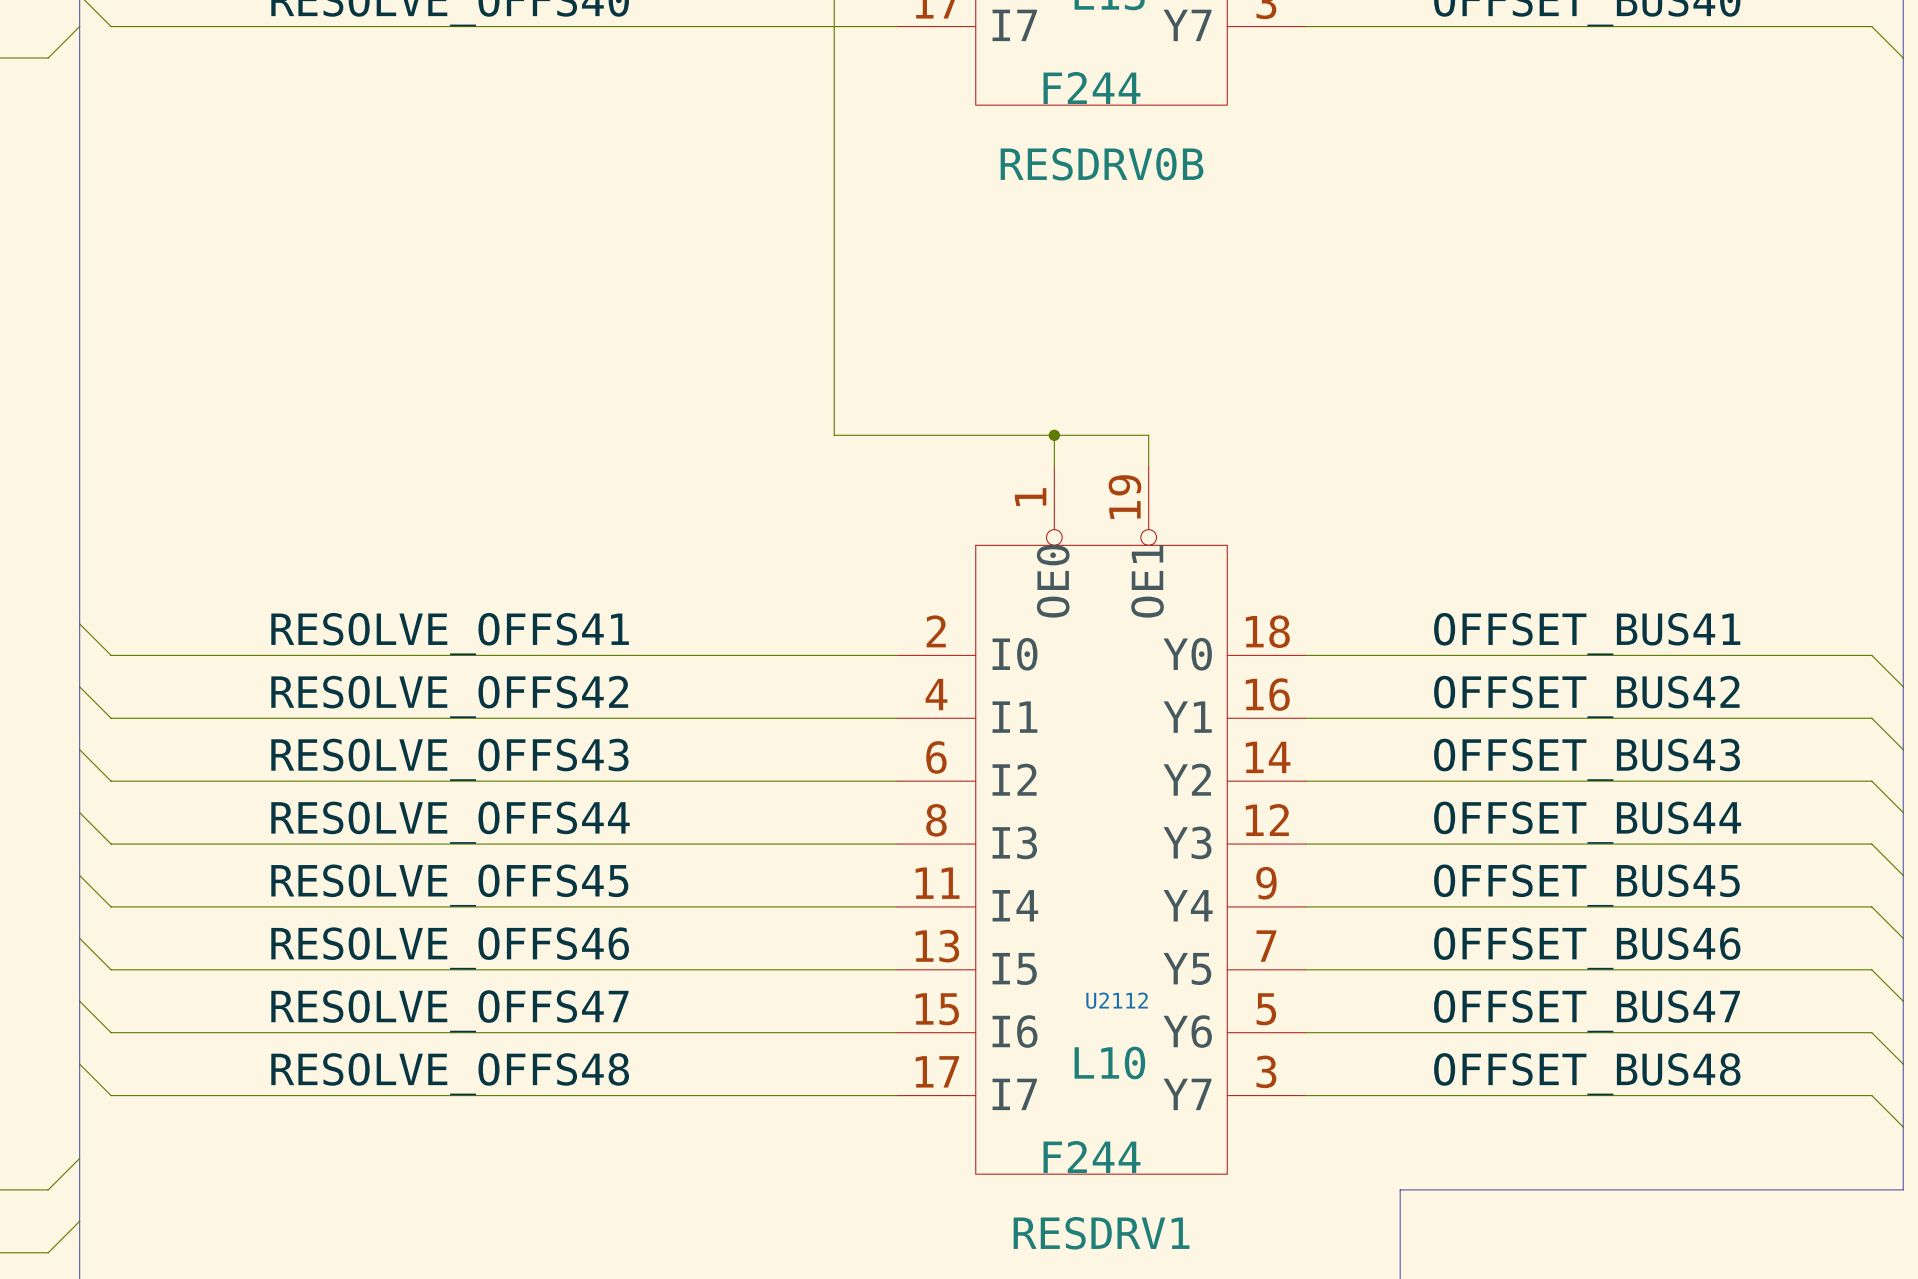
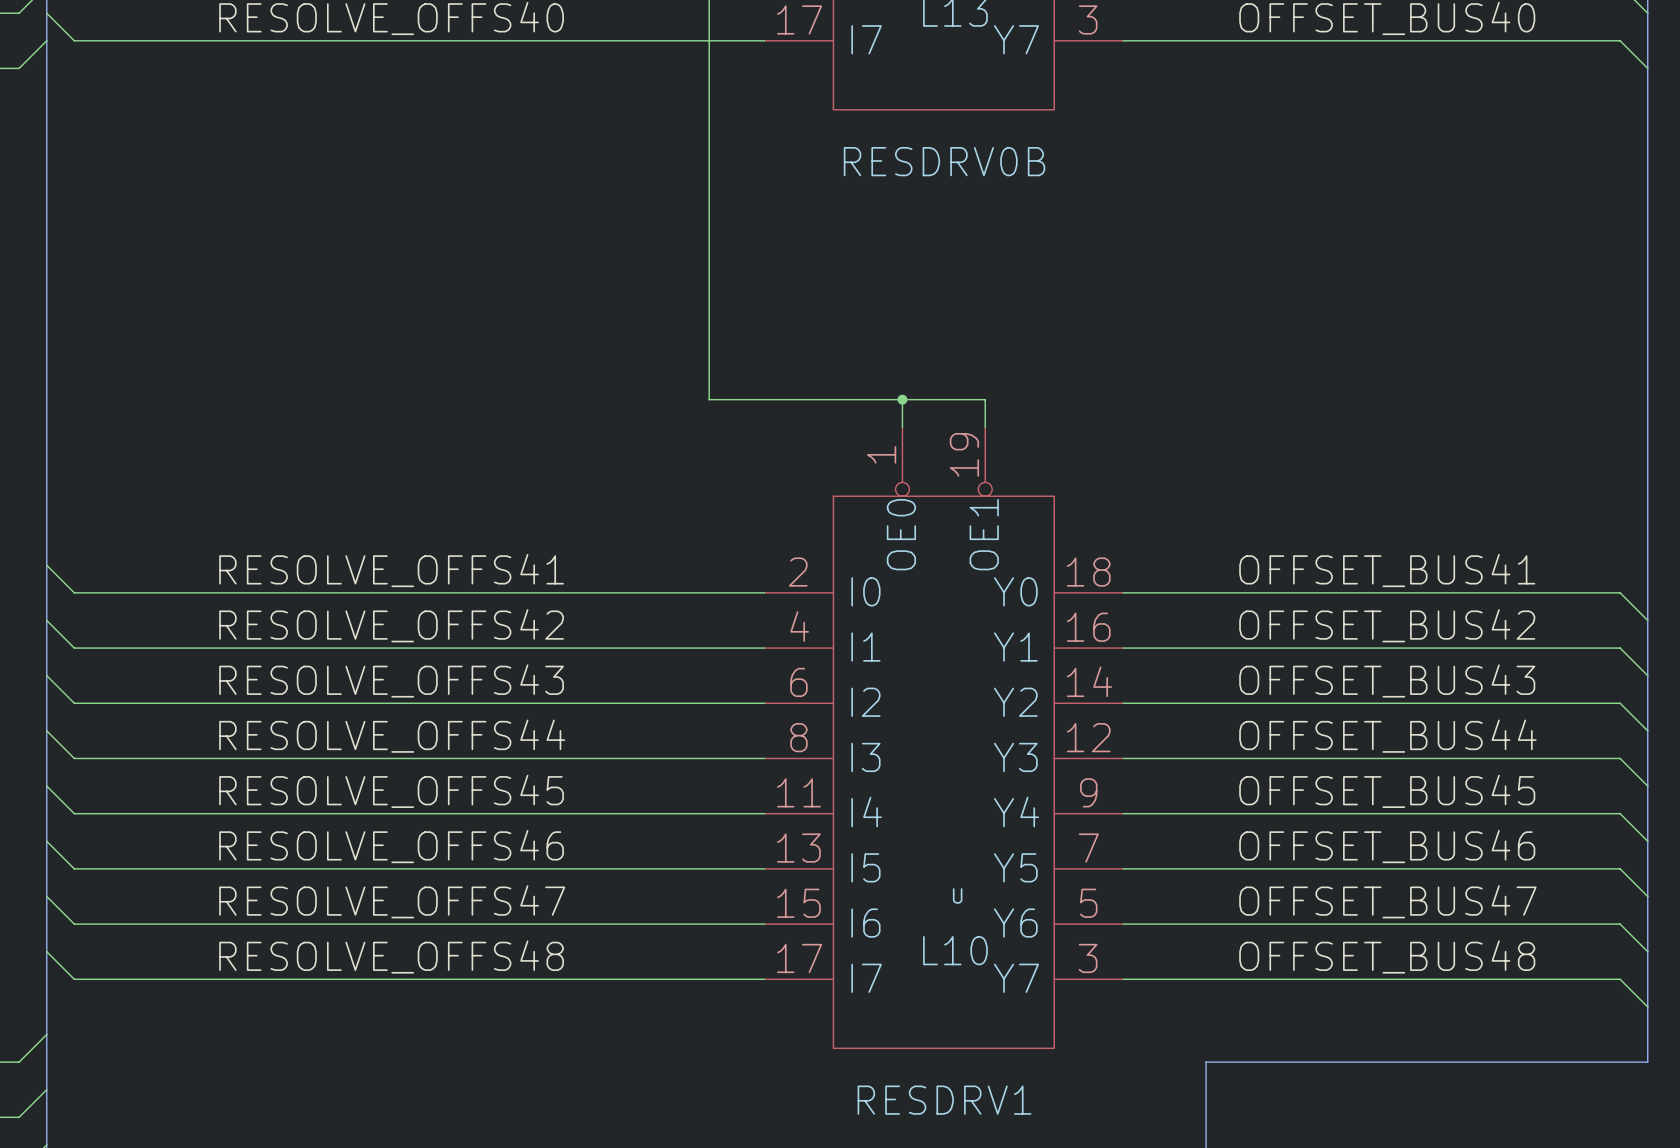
part value: F244 (1091, 87) -> none
U2112 name: U2112 (1117, 1000) -> U (957, 895)
U2112 value: F244 (1091, 1157) -> none

